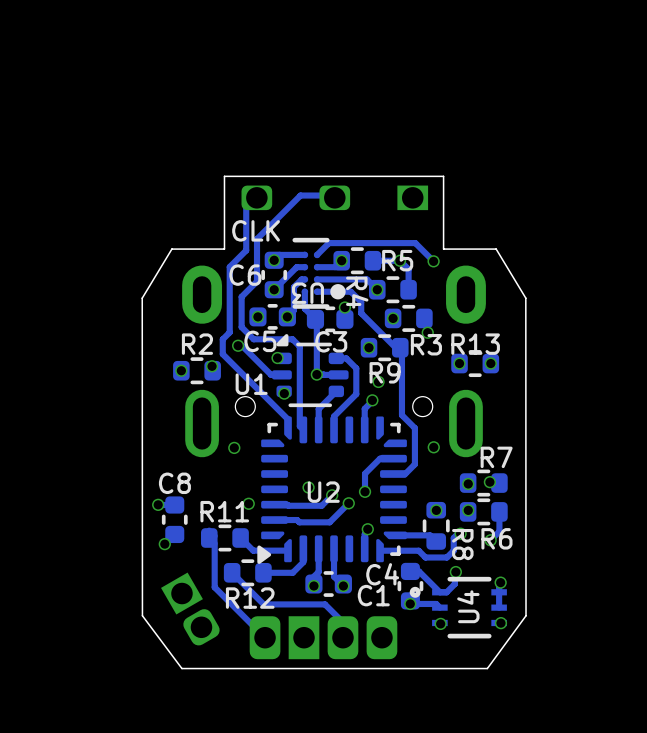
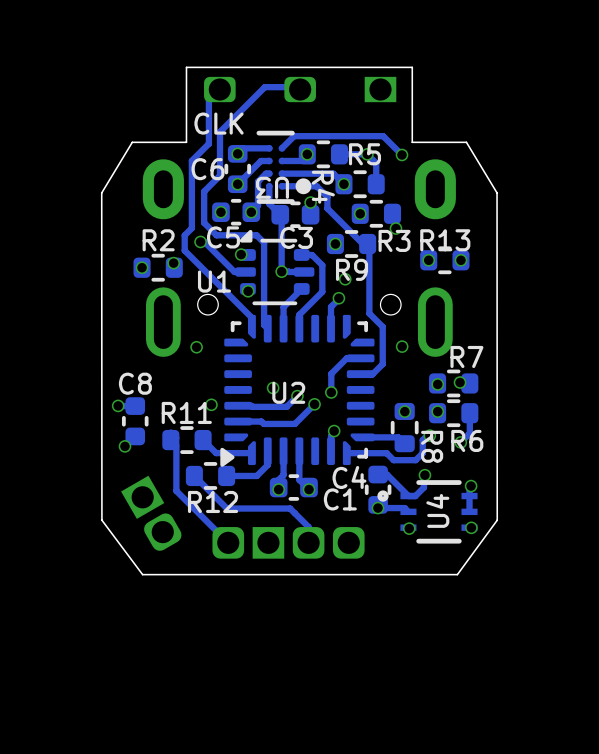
part footprint: [249, 616, 398, 660] -> [212, 527, 365, 559]

